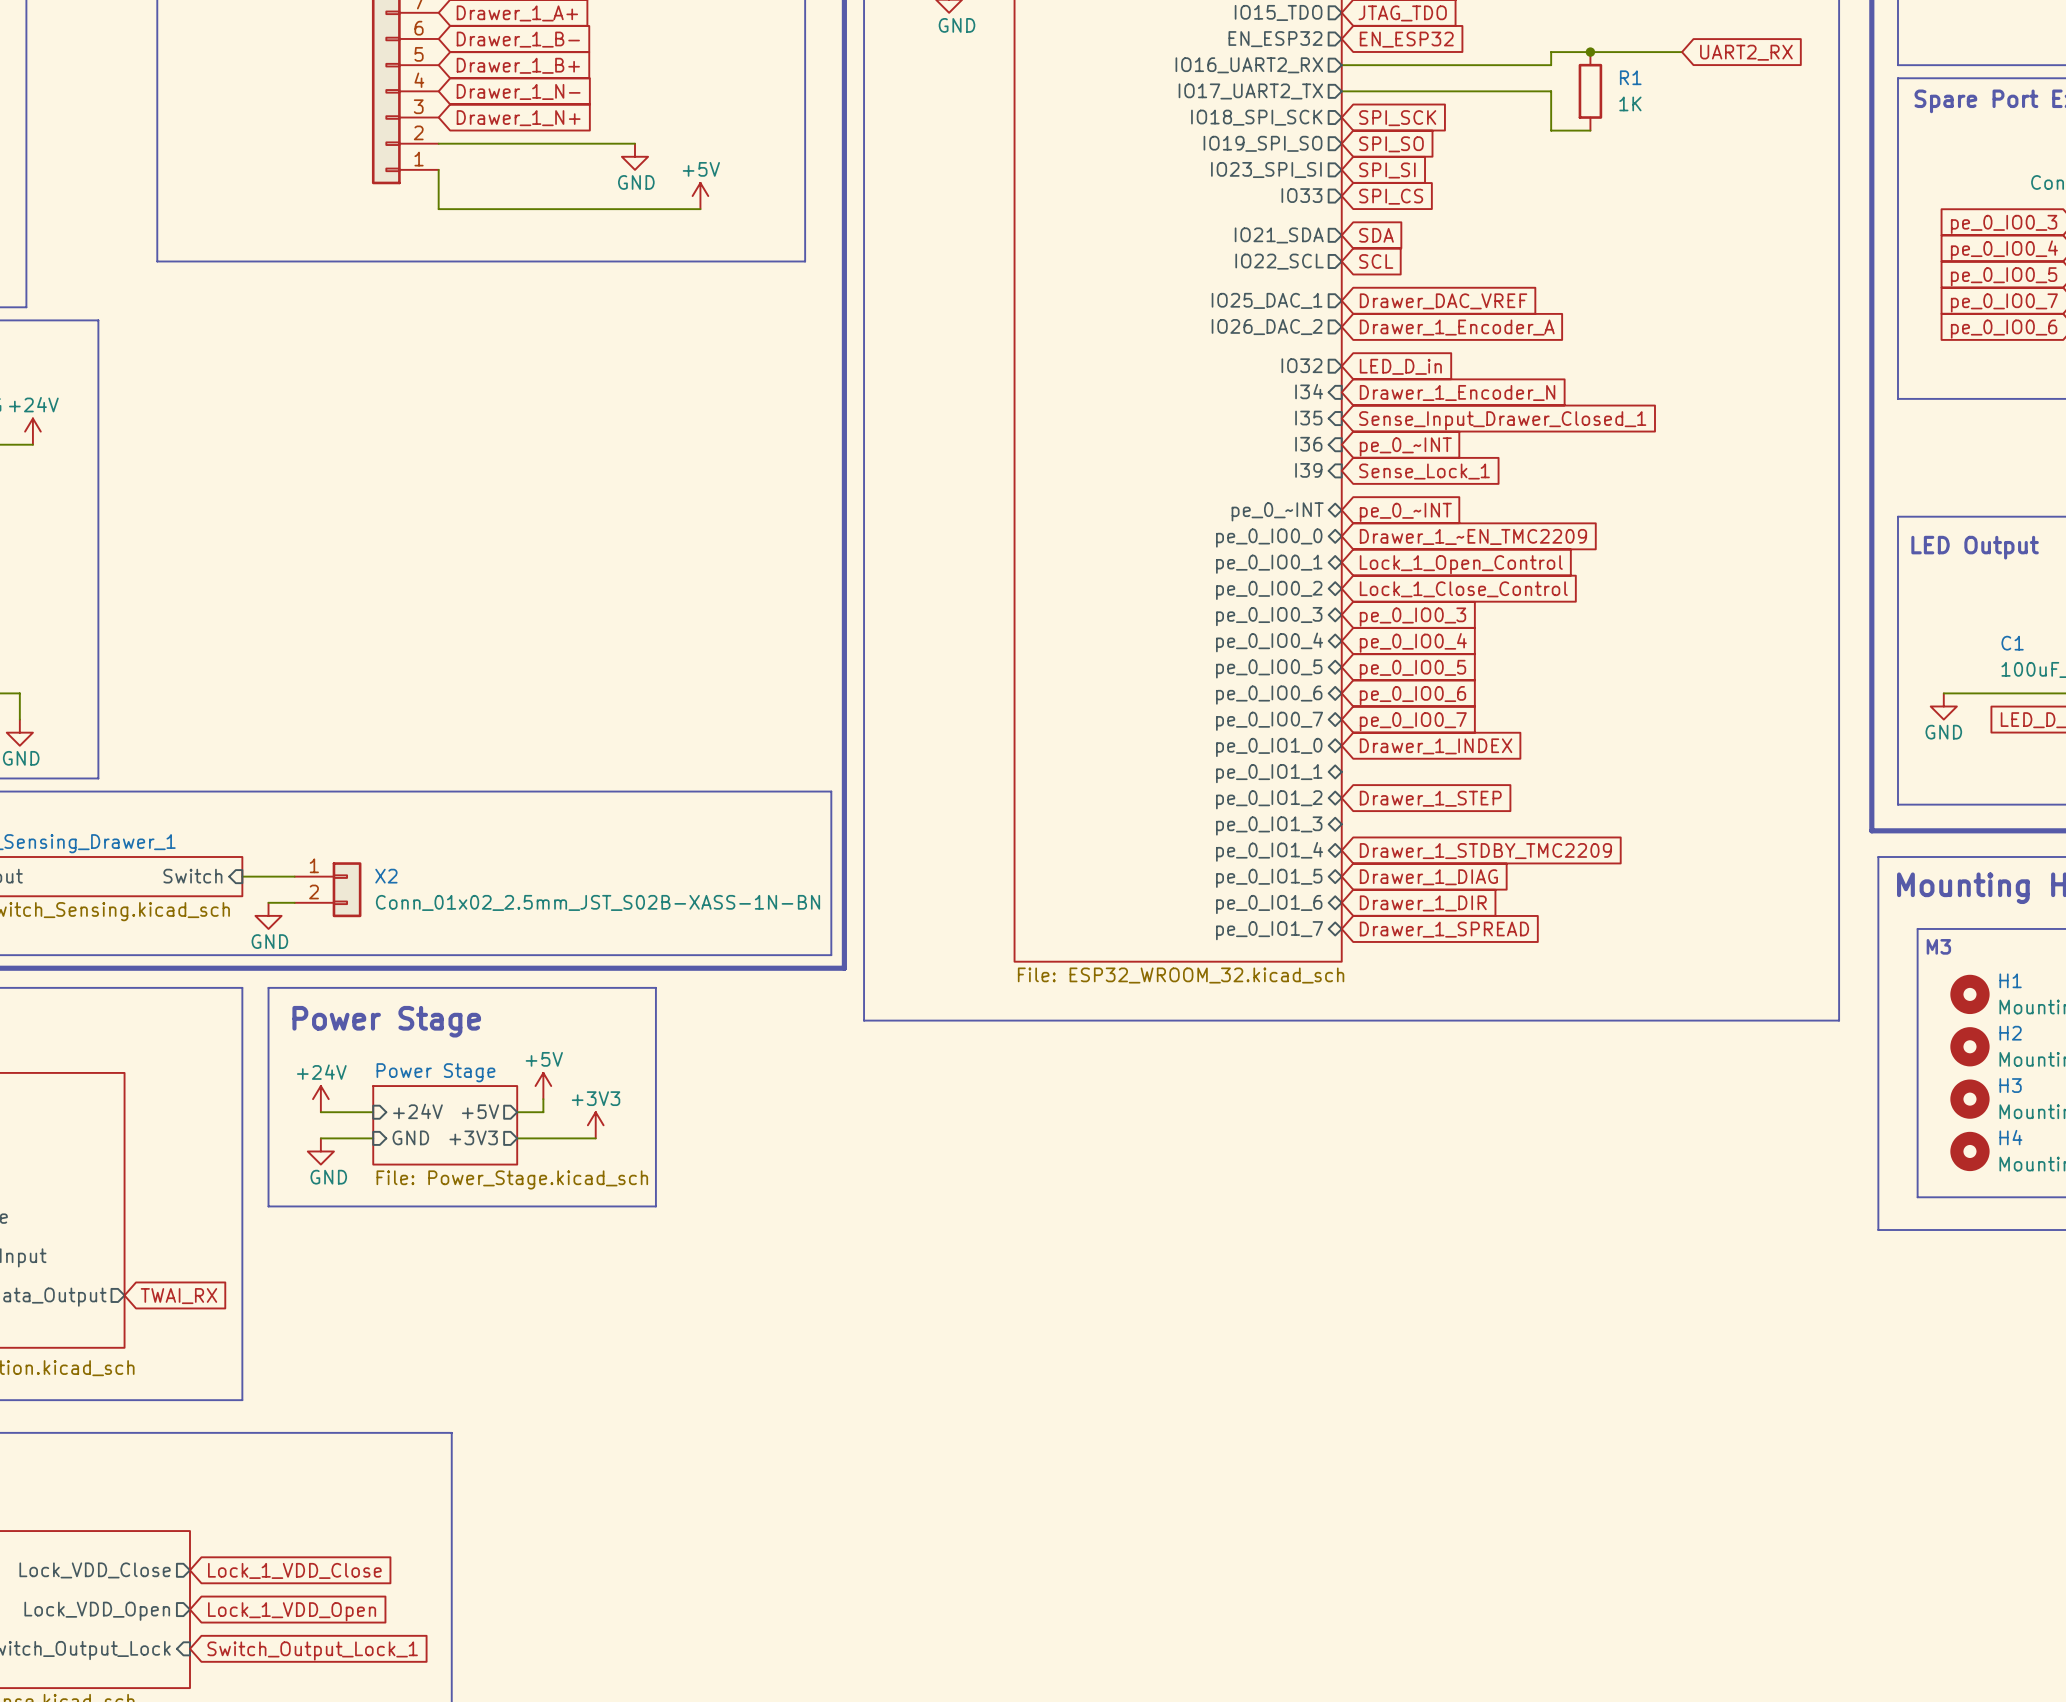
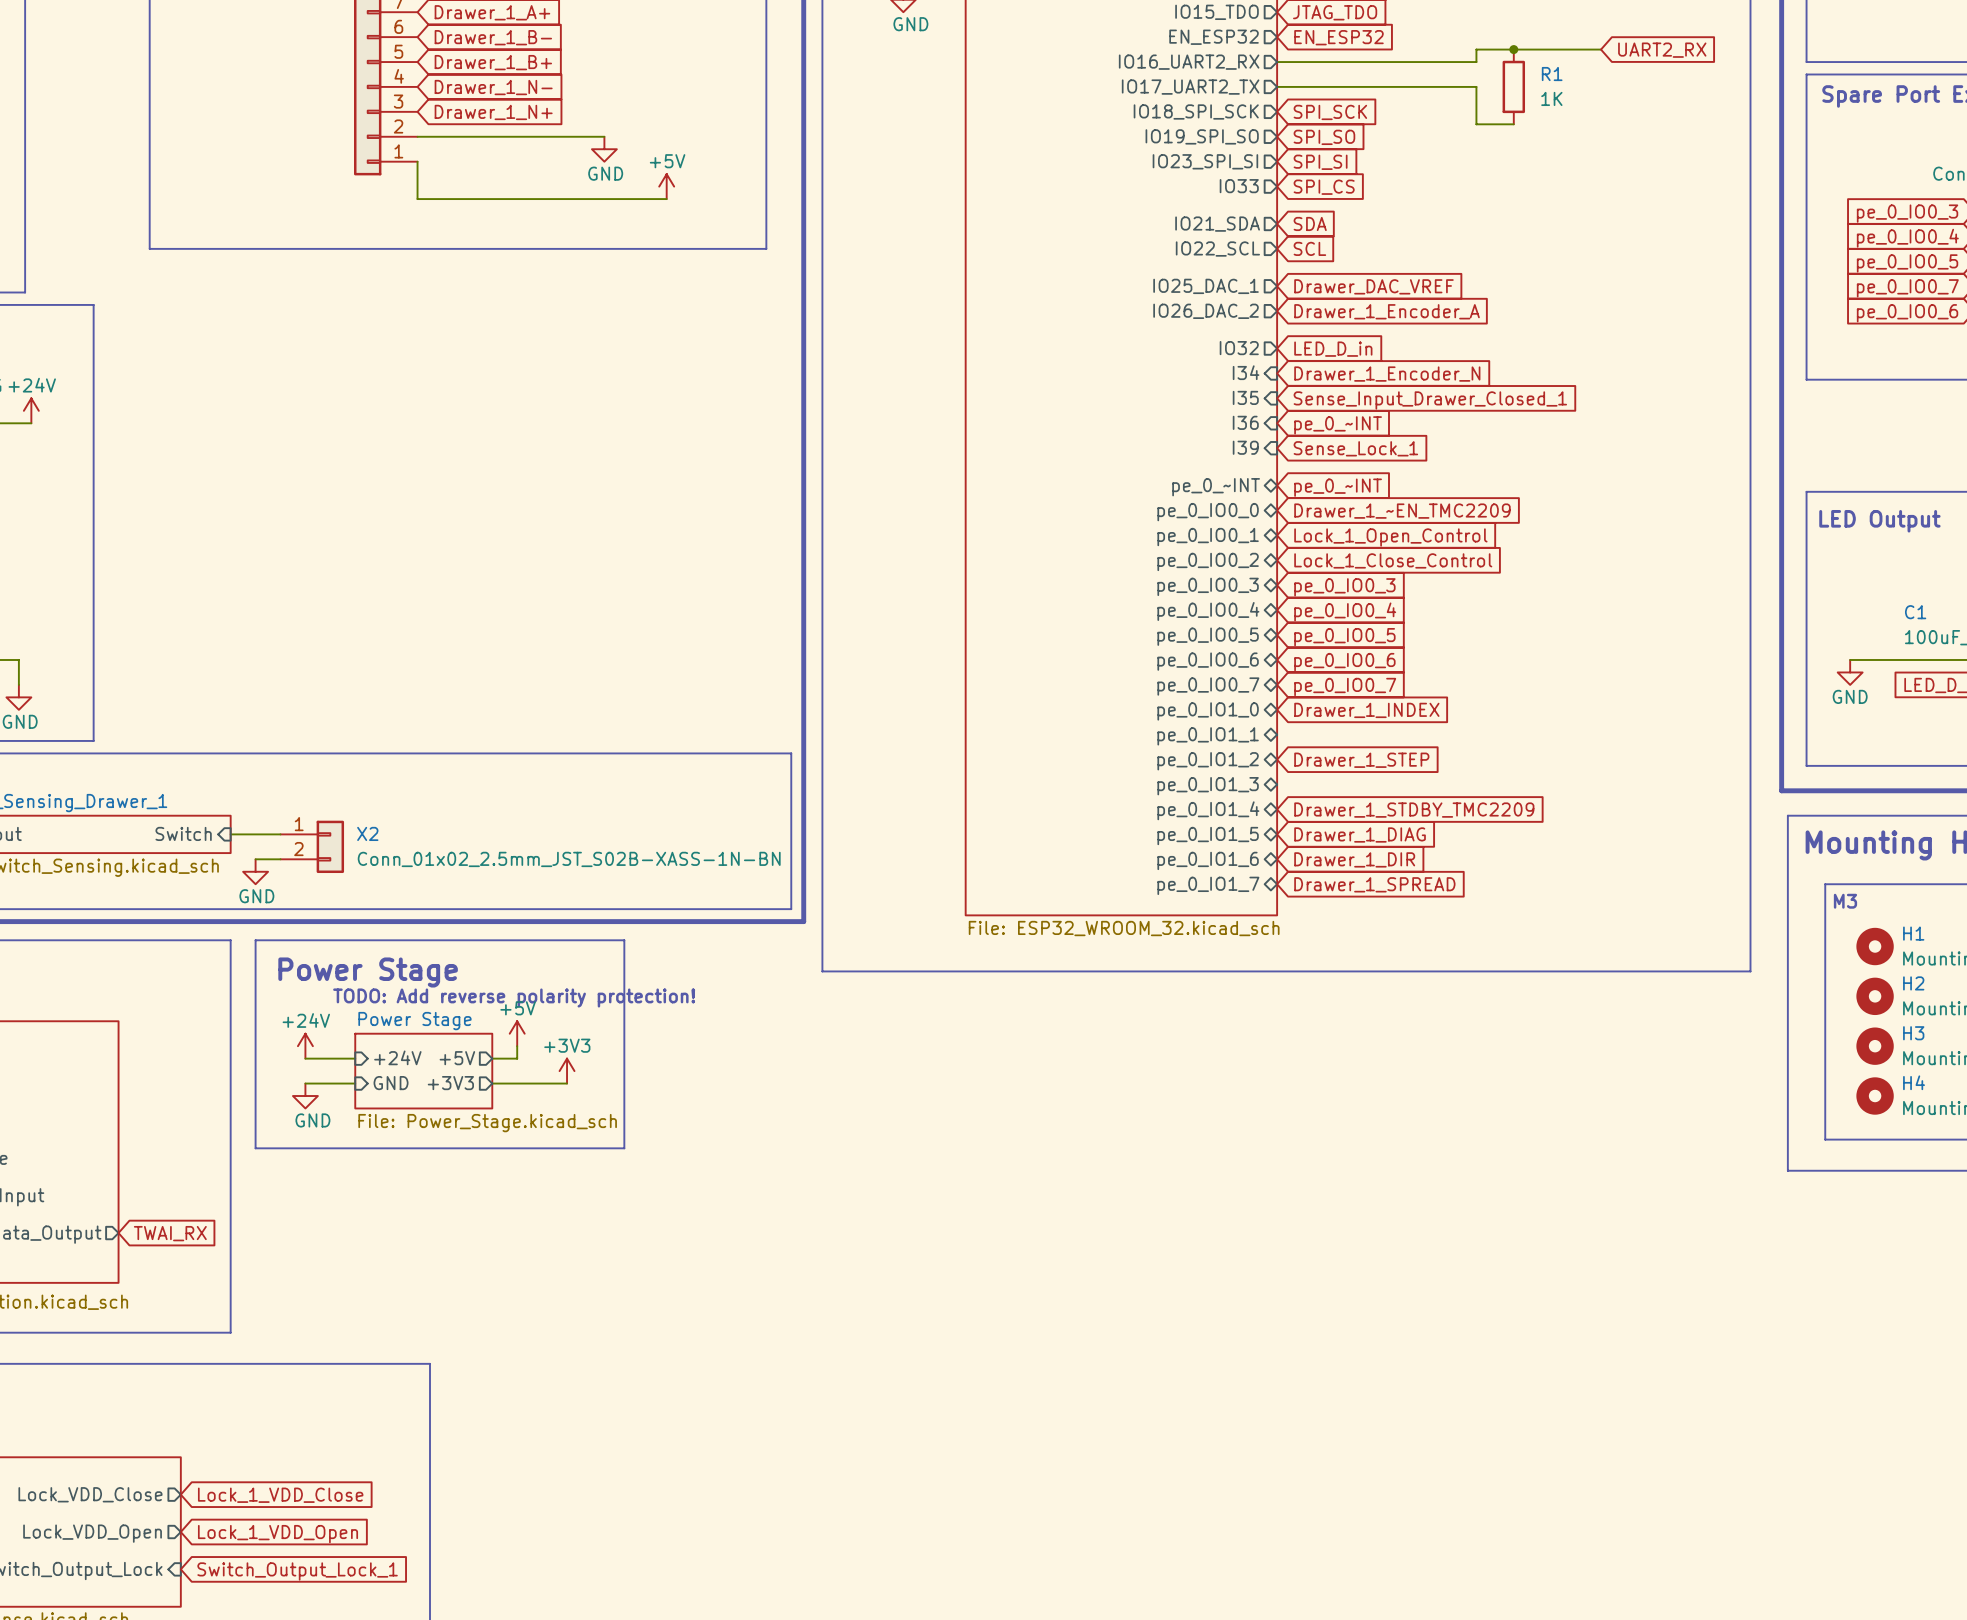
text: none -> TODO: Add reverse polarity protection! (514, 997)

